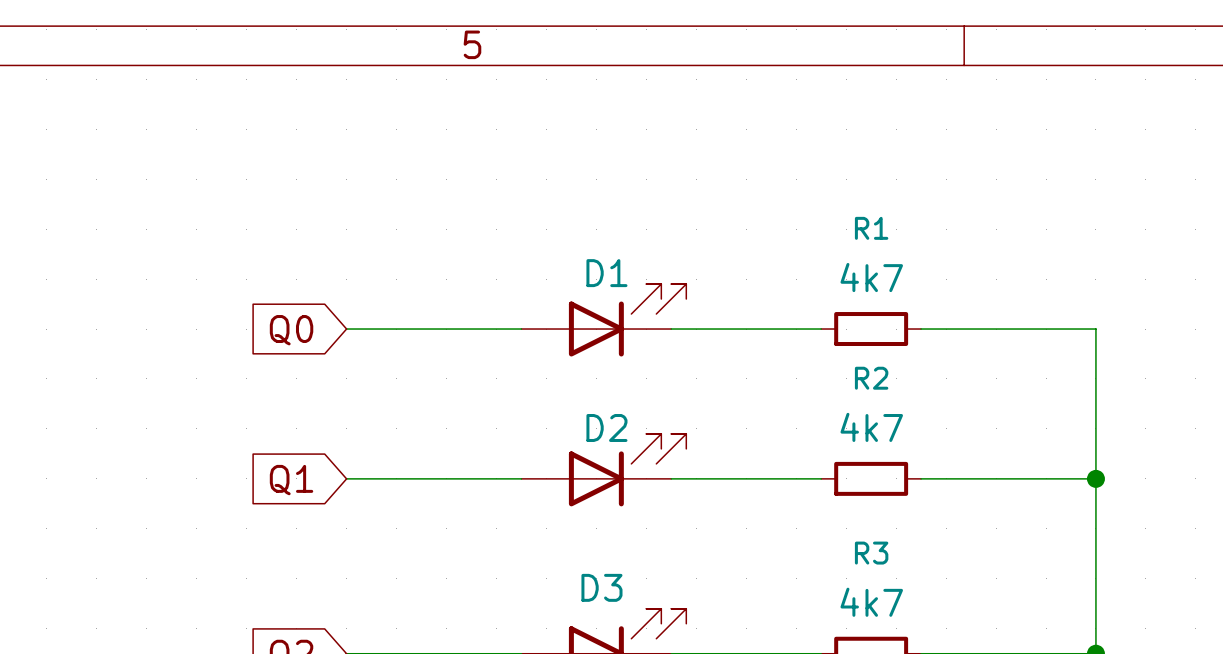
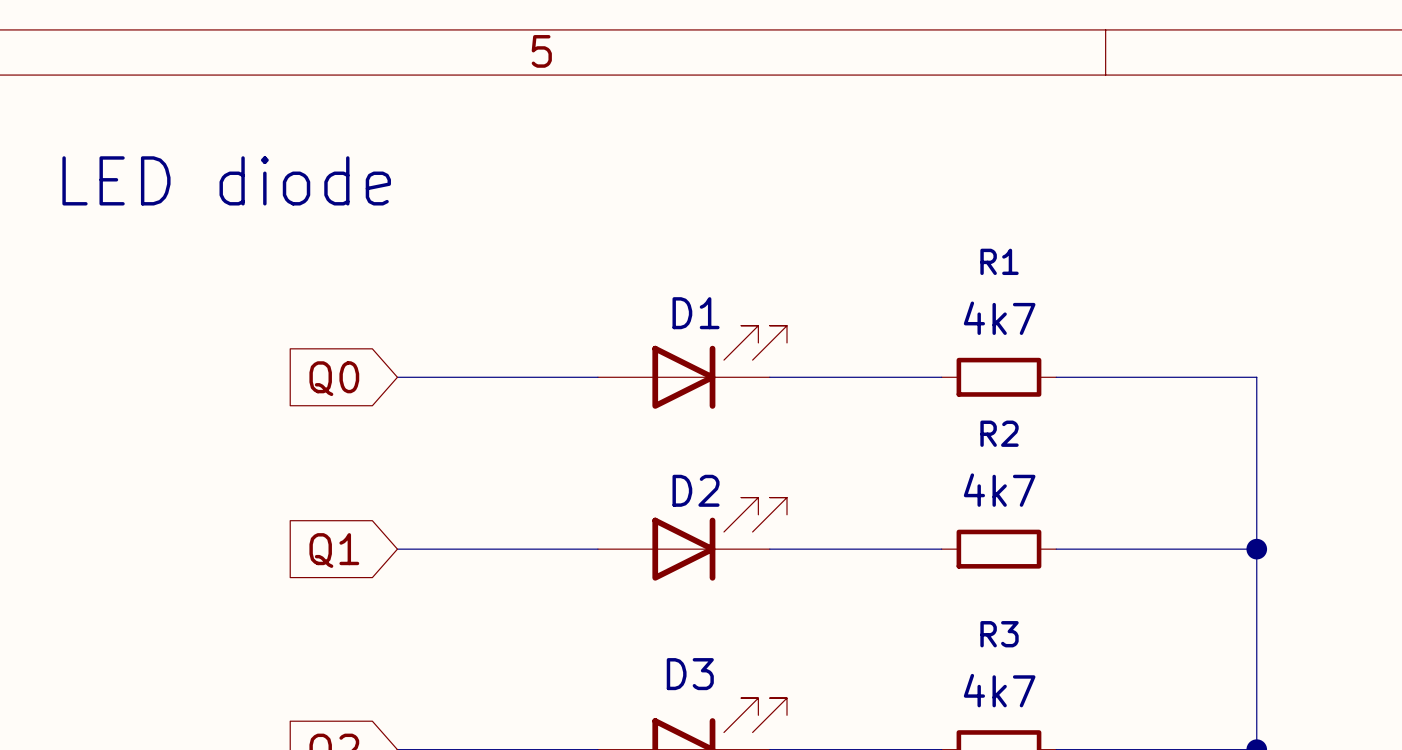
text: none -> LED diode (226, 180)

